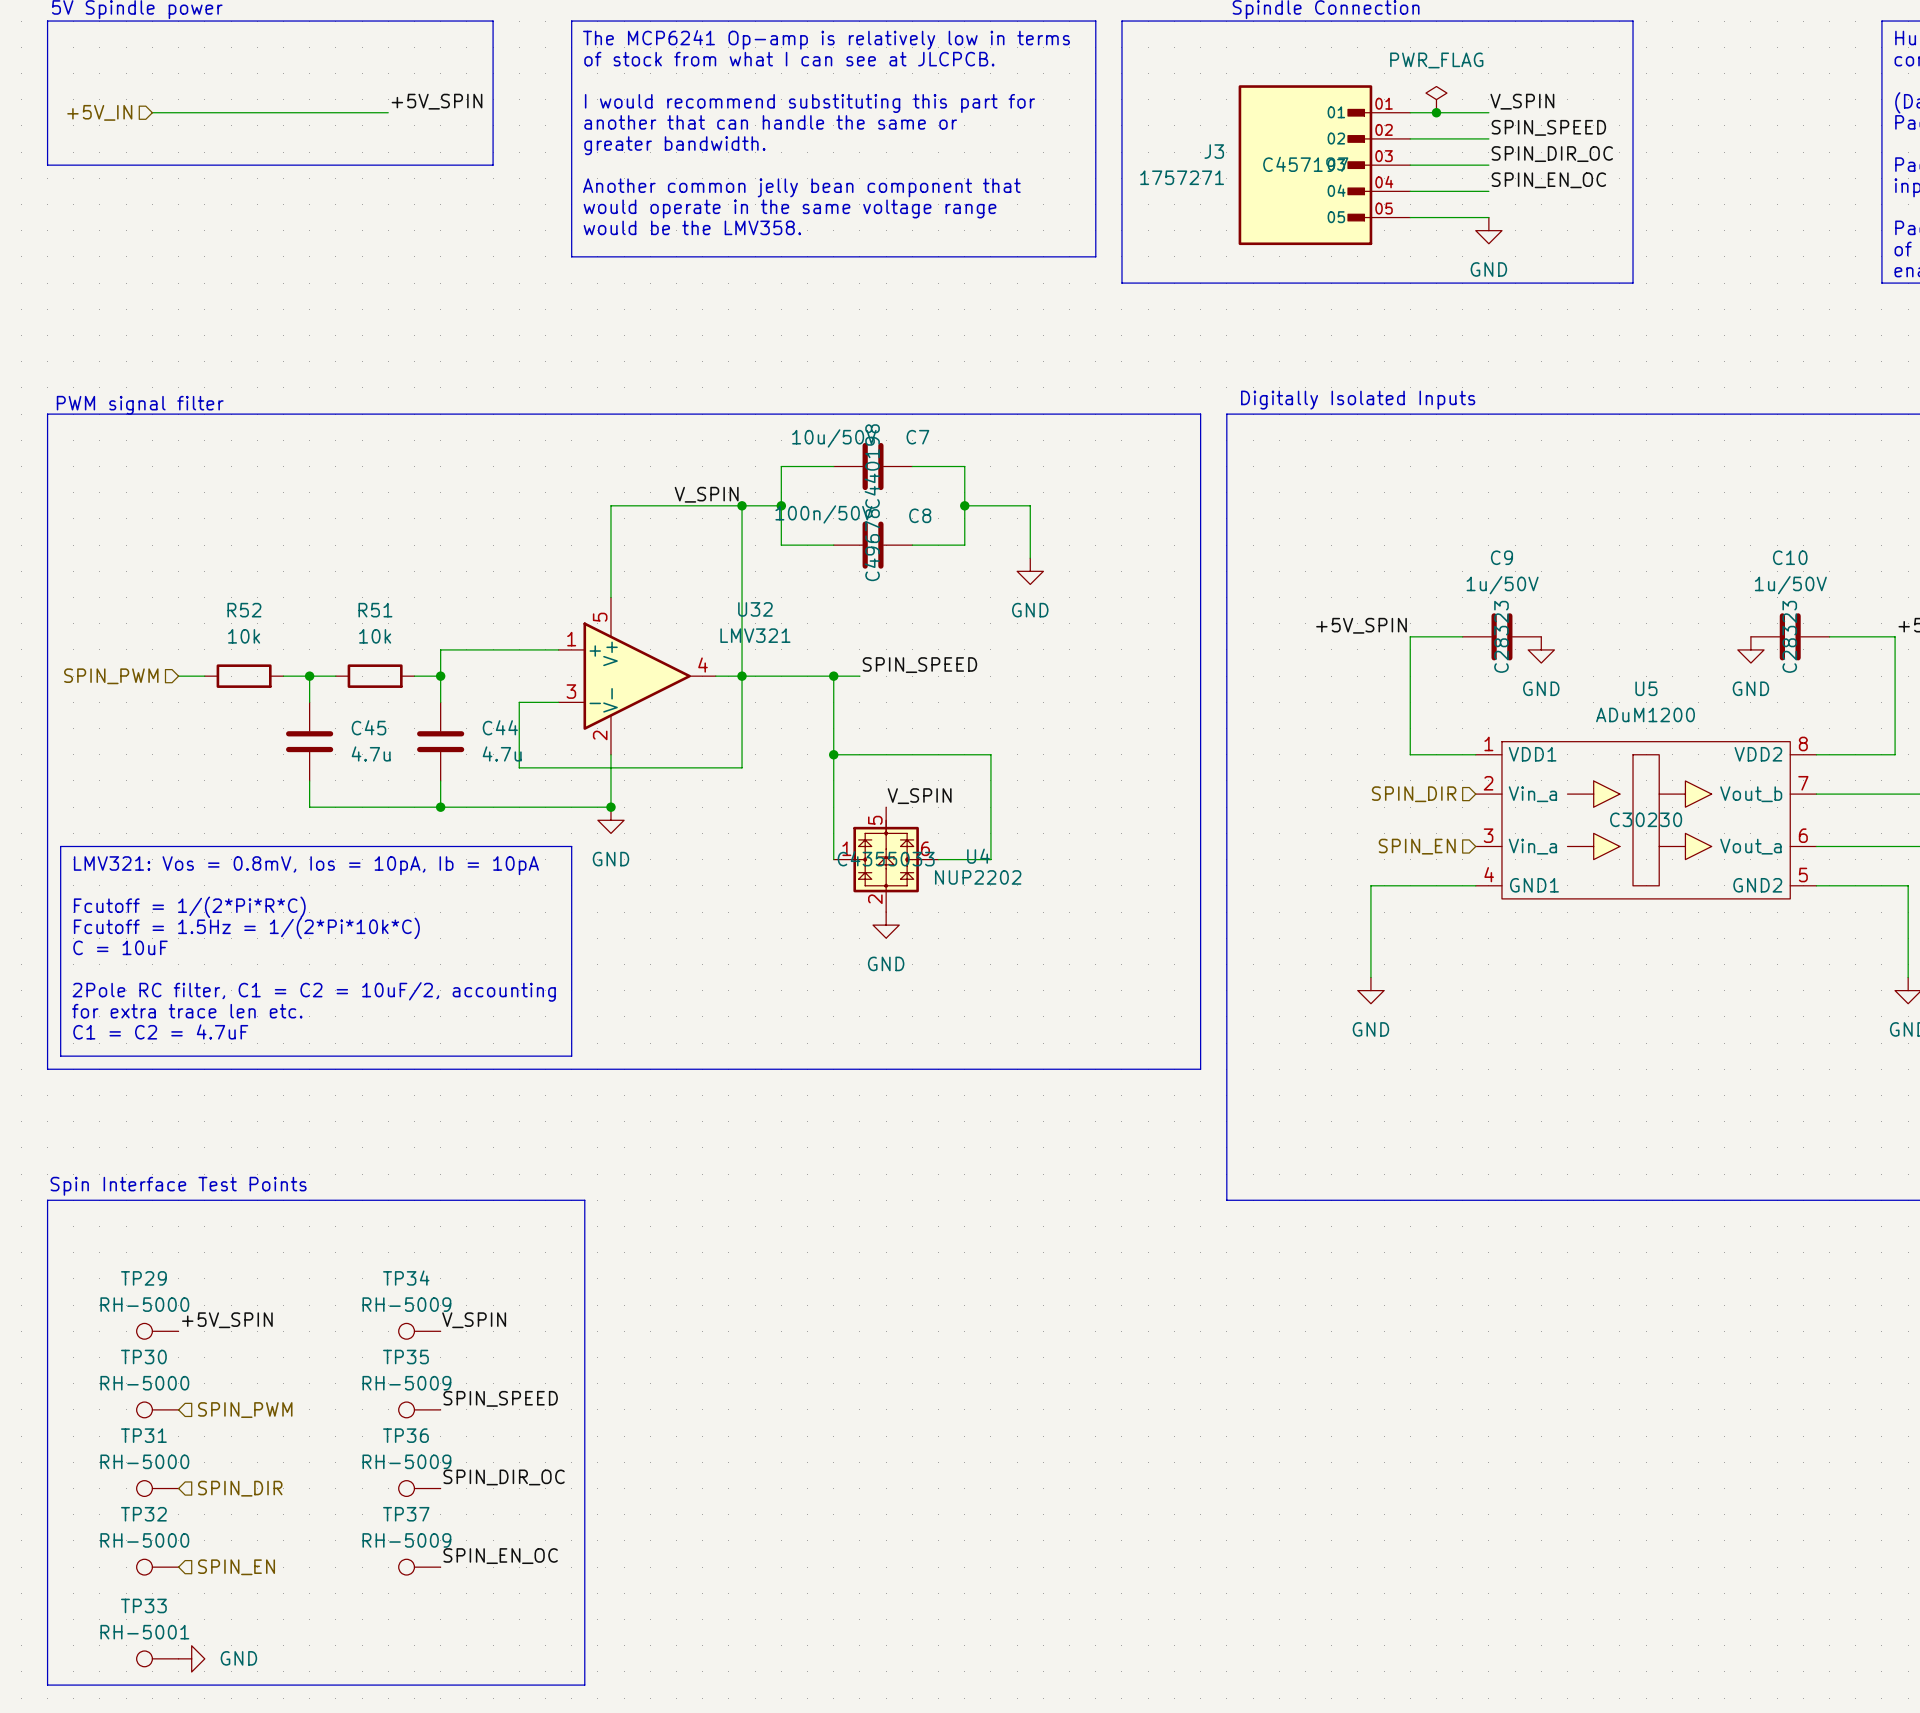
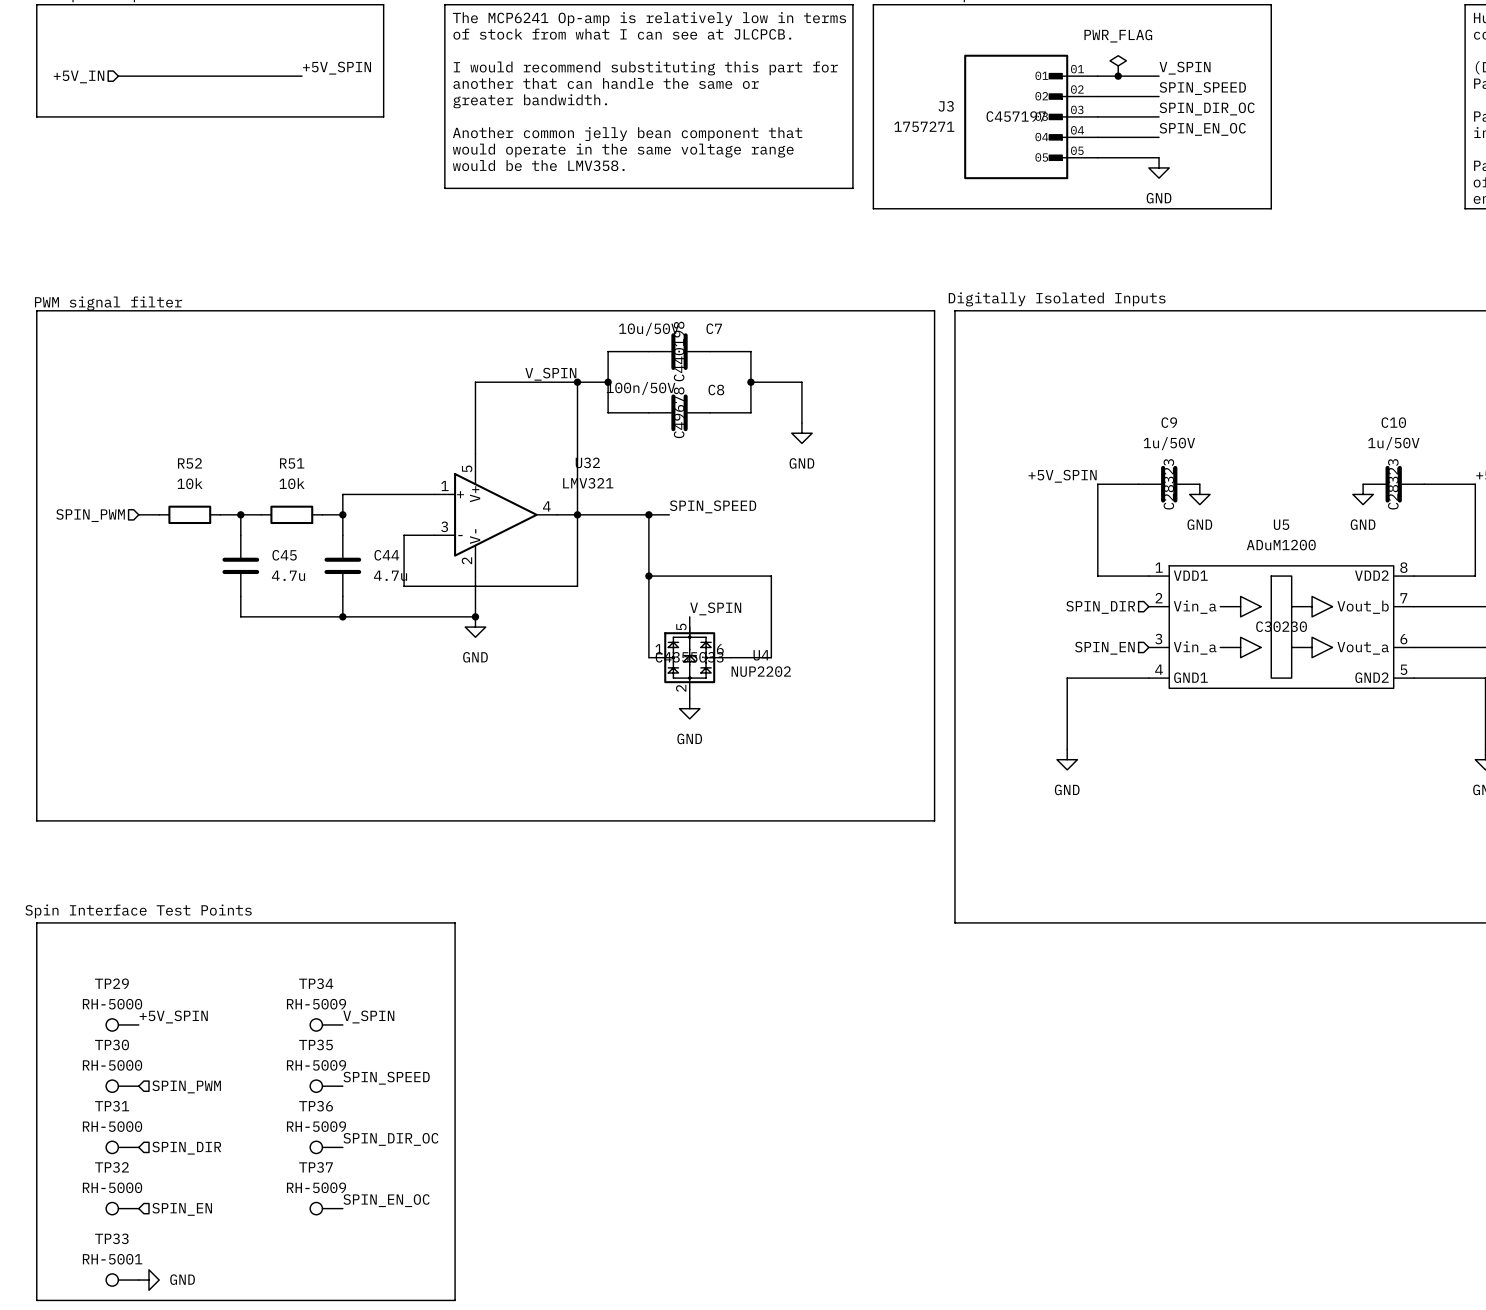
line: (60, 846) (571, 846) (571, 1056) (60, 1056) (60, 846) -> none
text: LMV321: Vos = 0.8mV, Ios = 10pA, Ib = 10pA (306, 865) -> none
text: Fcutoff = 1/(2*Pi*R*C) (189, 907) -> none
text: Fcutoff = 1.5Hz = 1/(2*Pi*10k*C) (246, 928) -> none
text: C = 10uF (120, 947) -> none
text: 2Pole RC filter, C1 = C2 = 10uF/2, accounting (314, 991) -> none
text: for extra trace len etc. (187, 1011) -> none
text: C1 = C2 = 4.7uF (160, 1031) -> none

